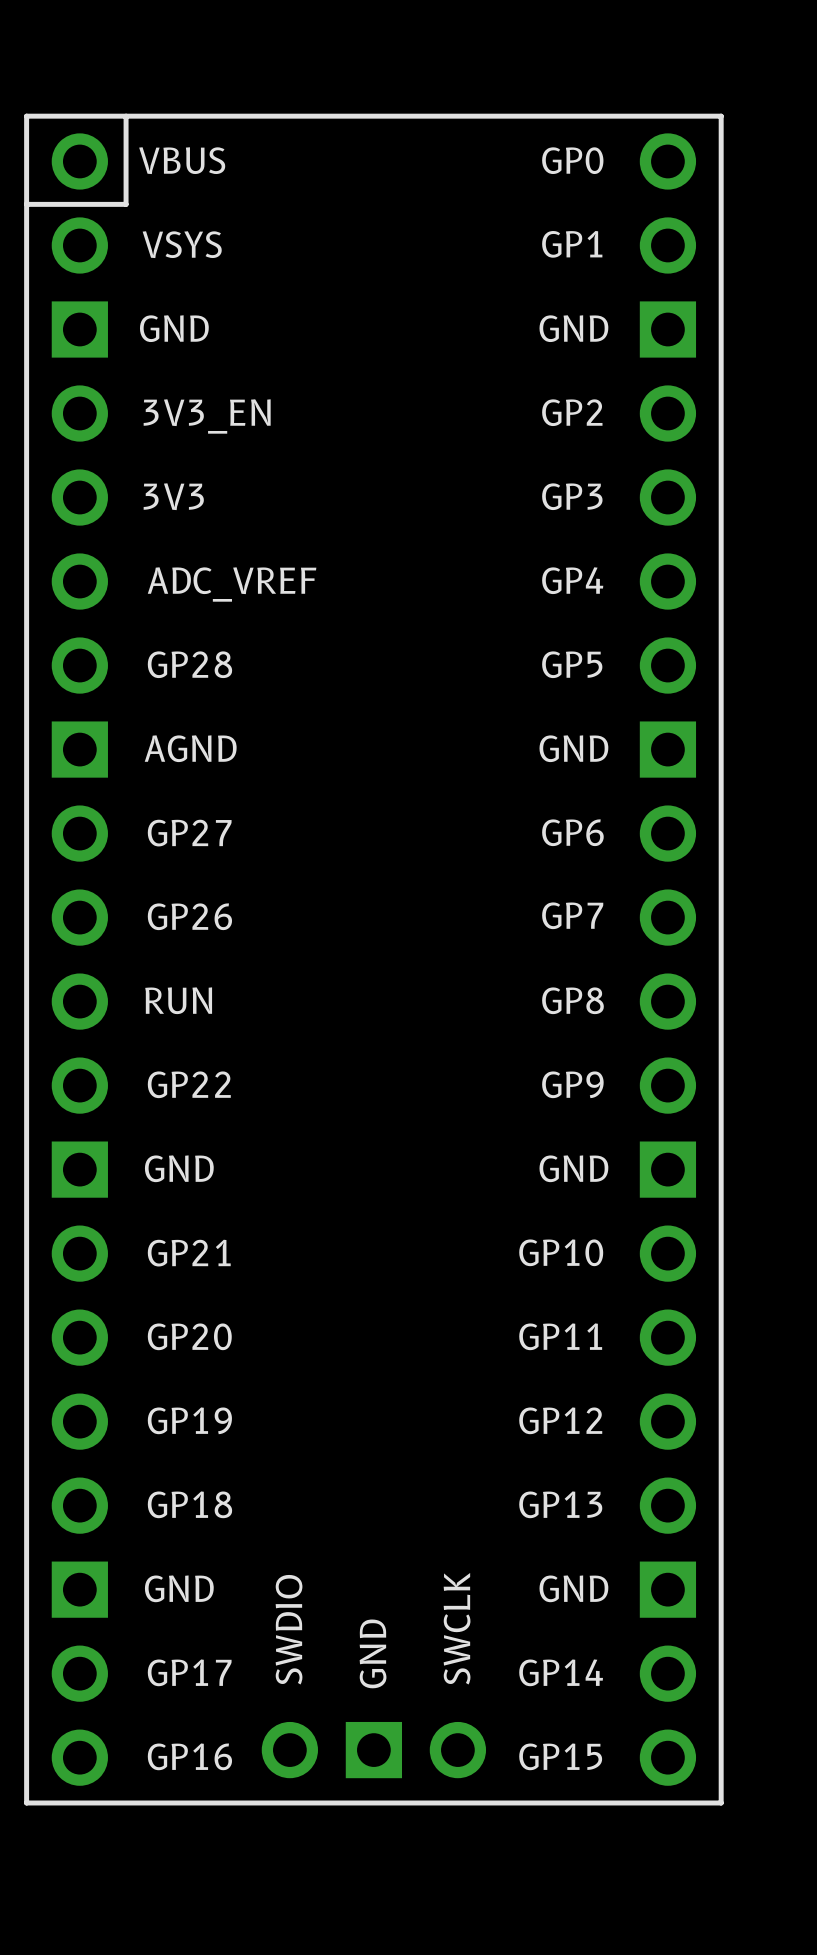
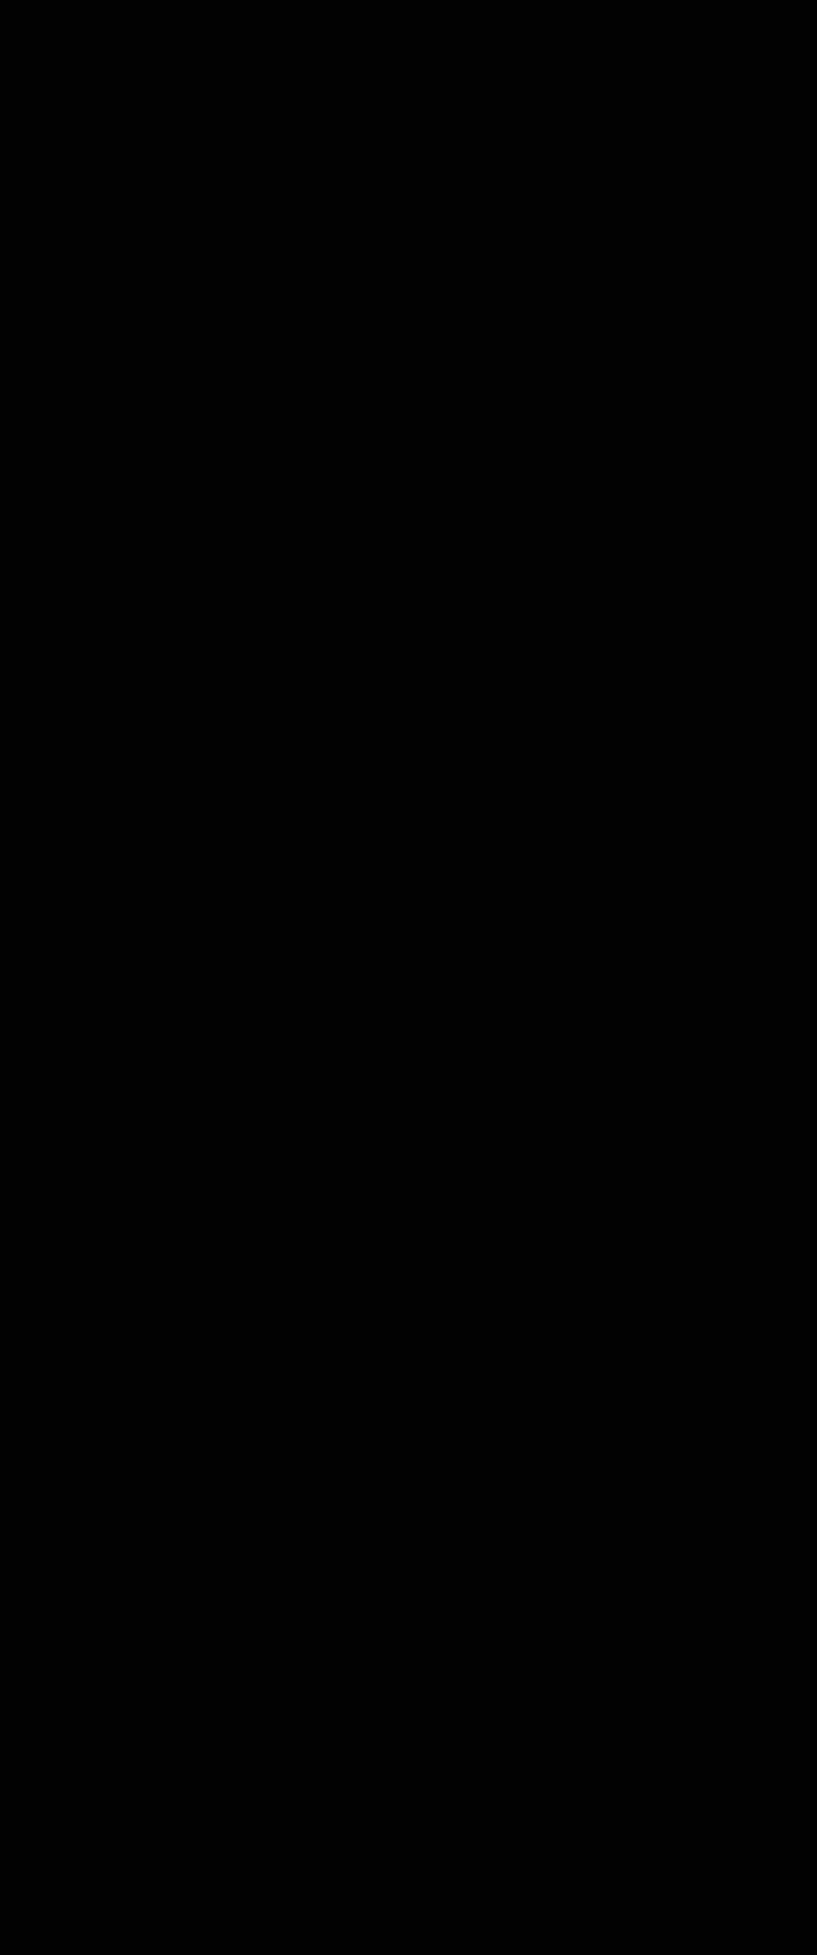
part: (373, 959) -> none

